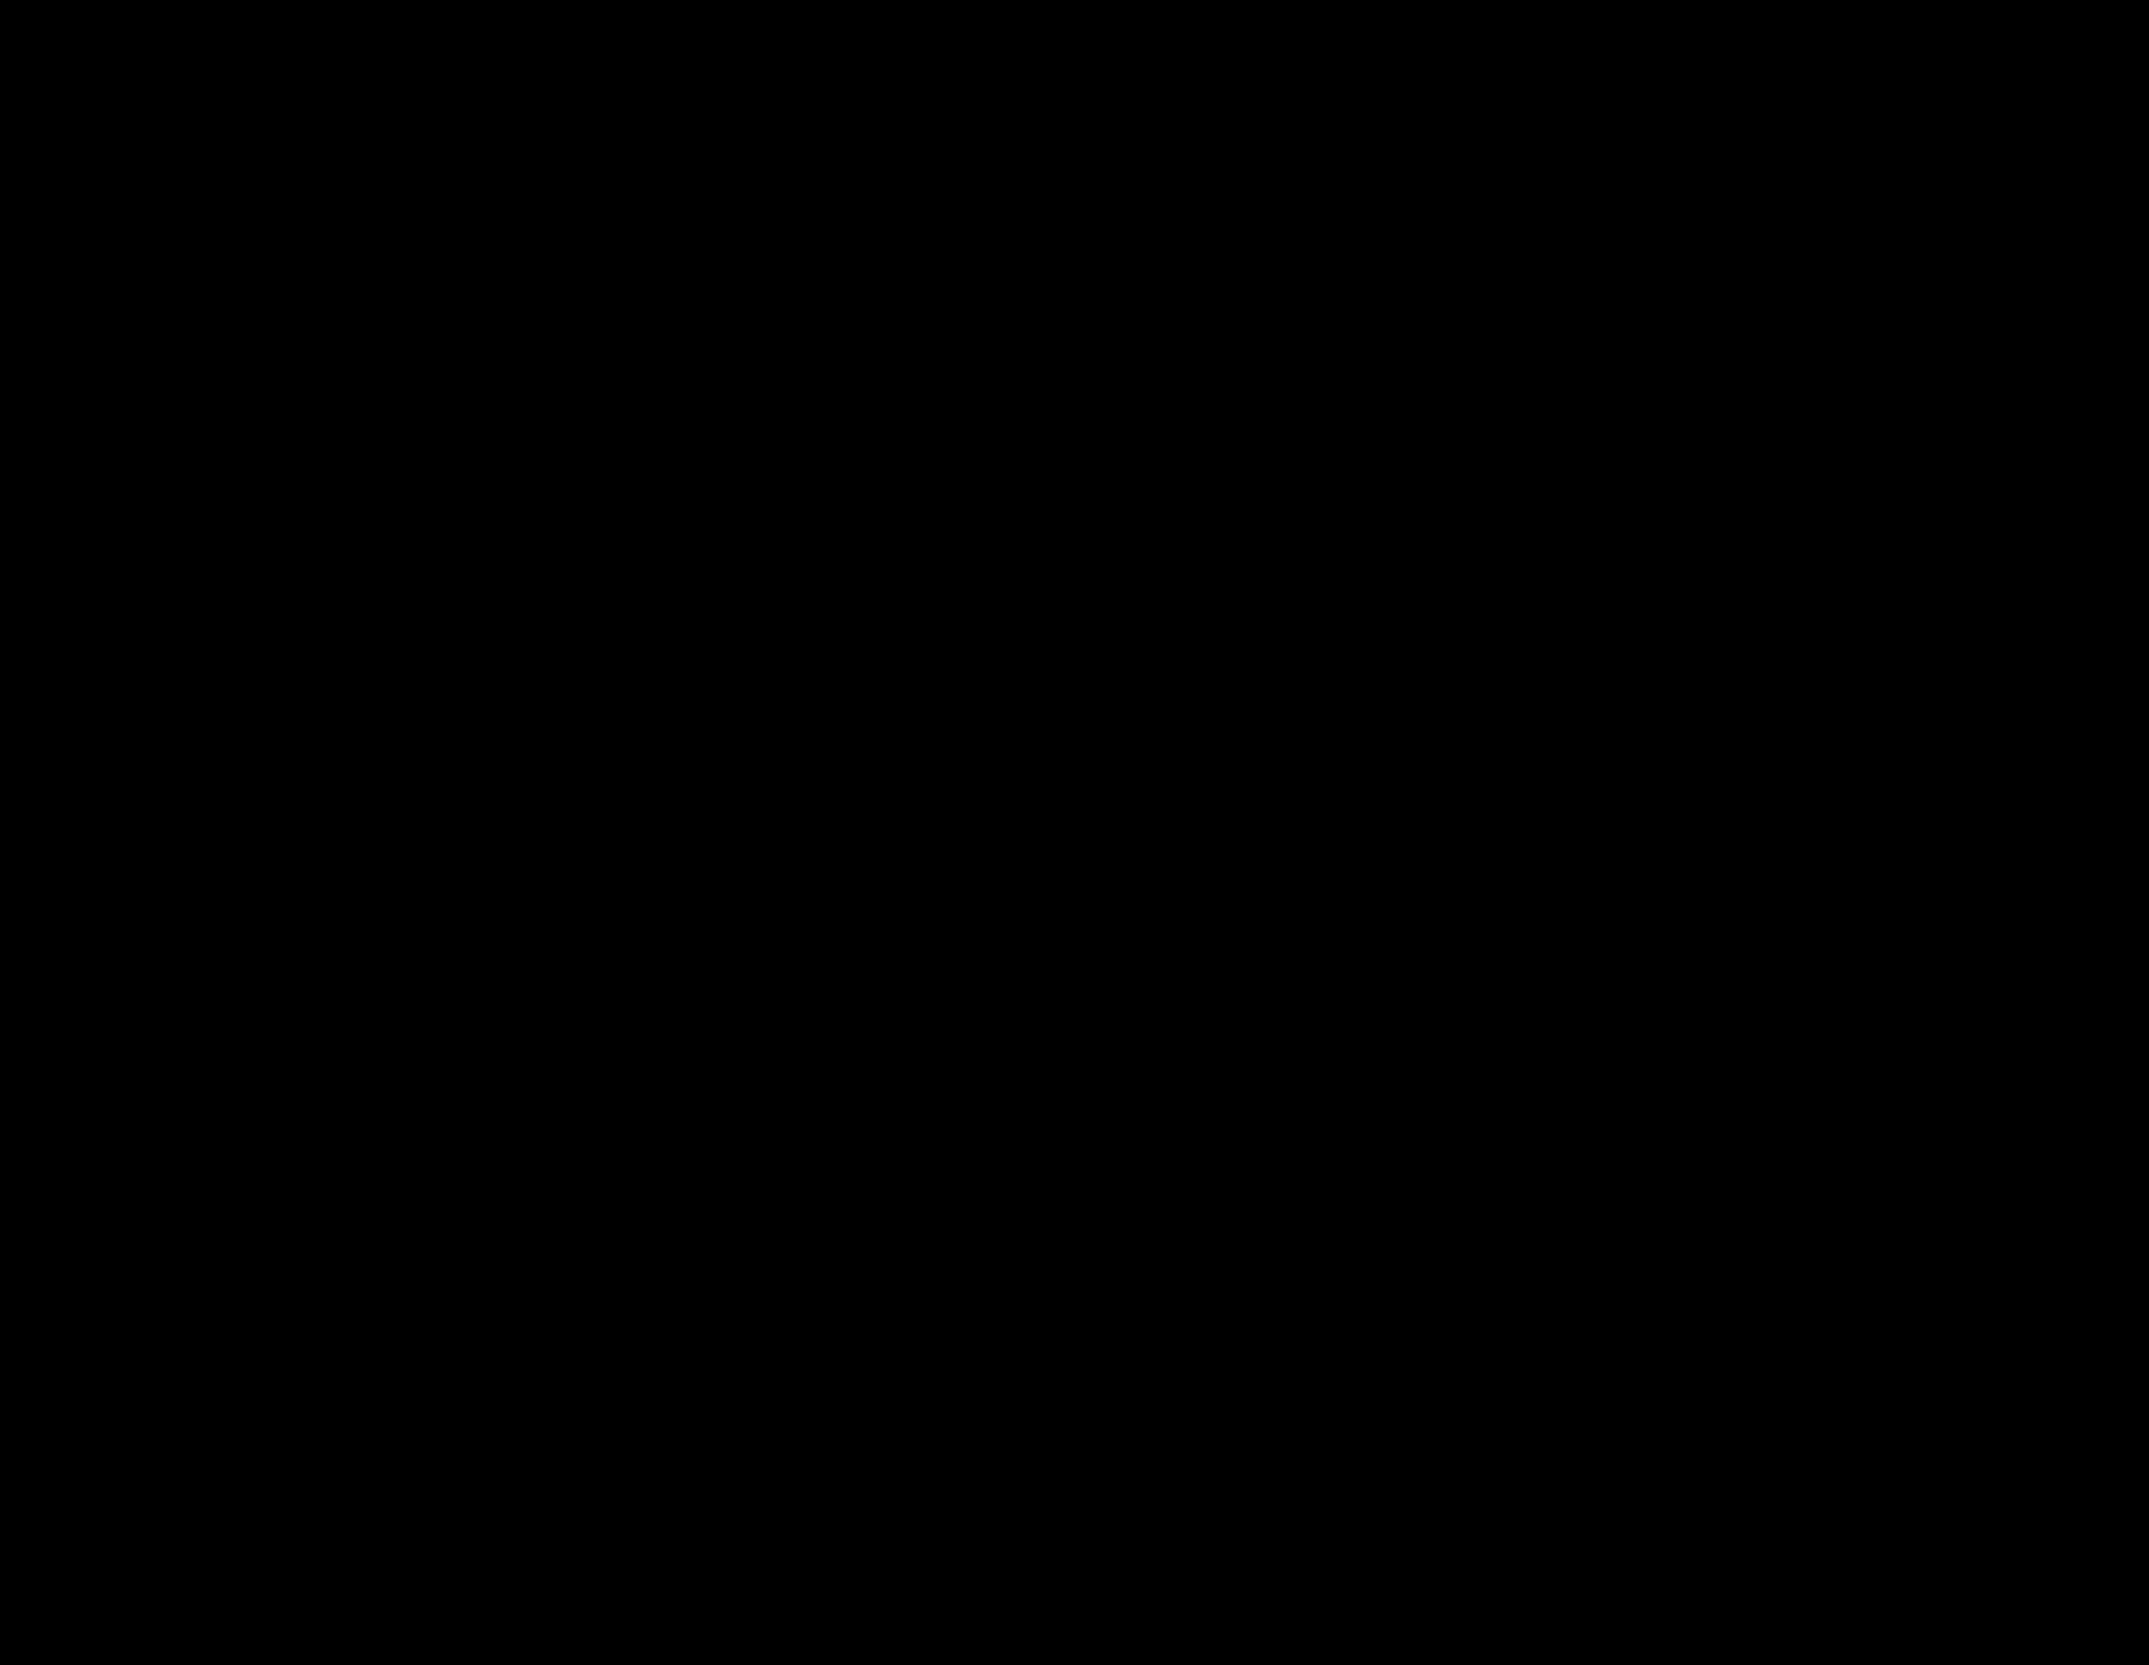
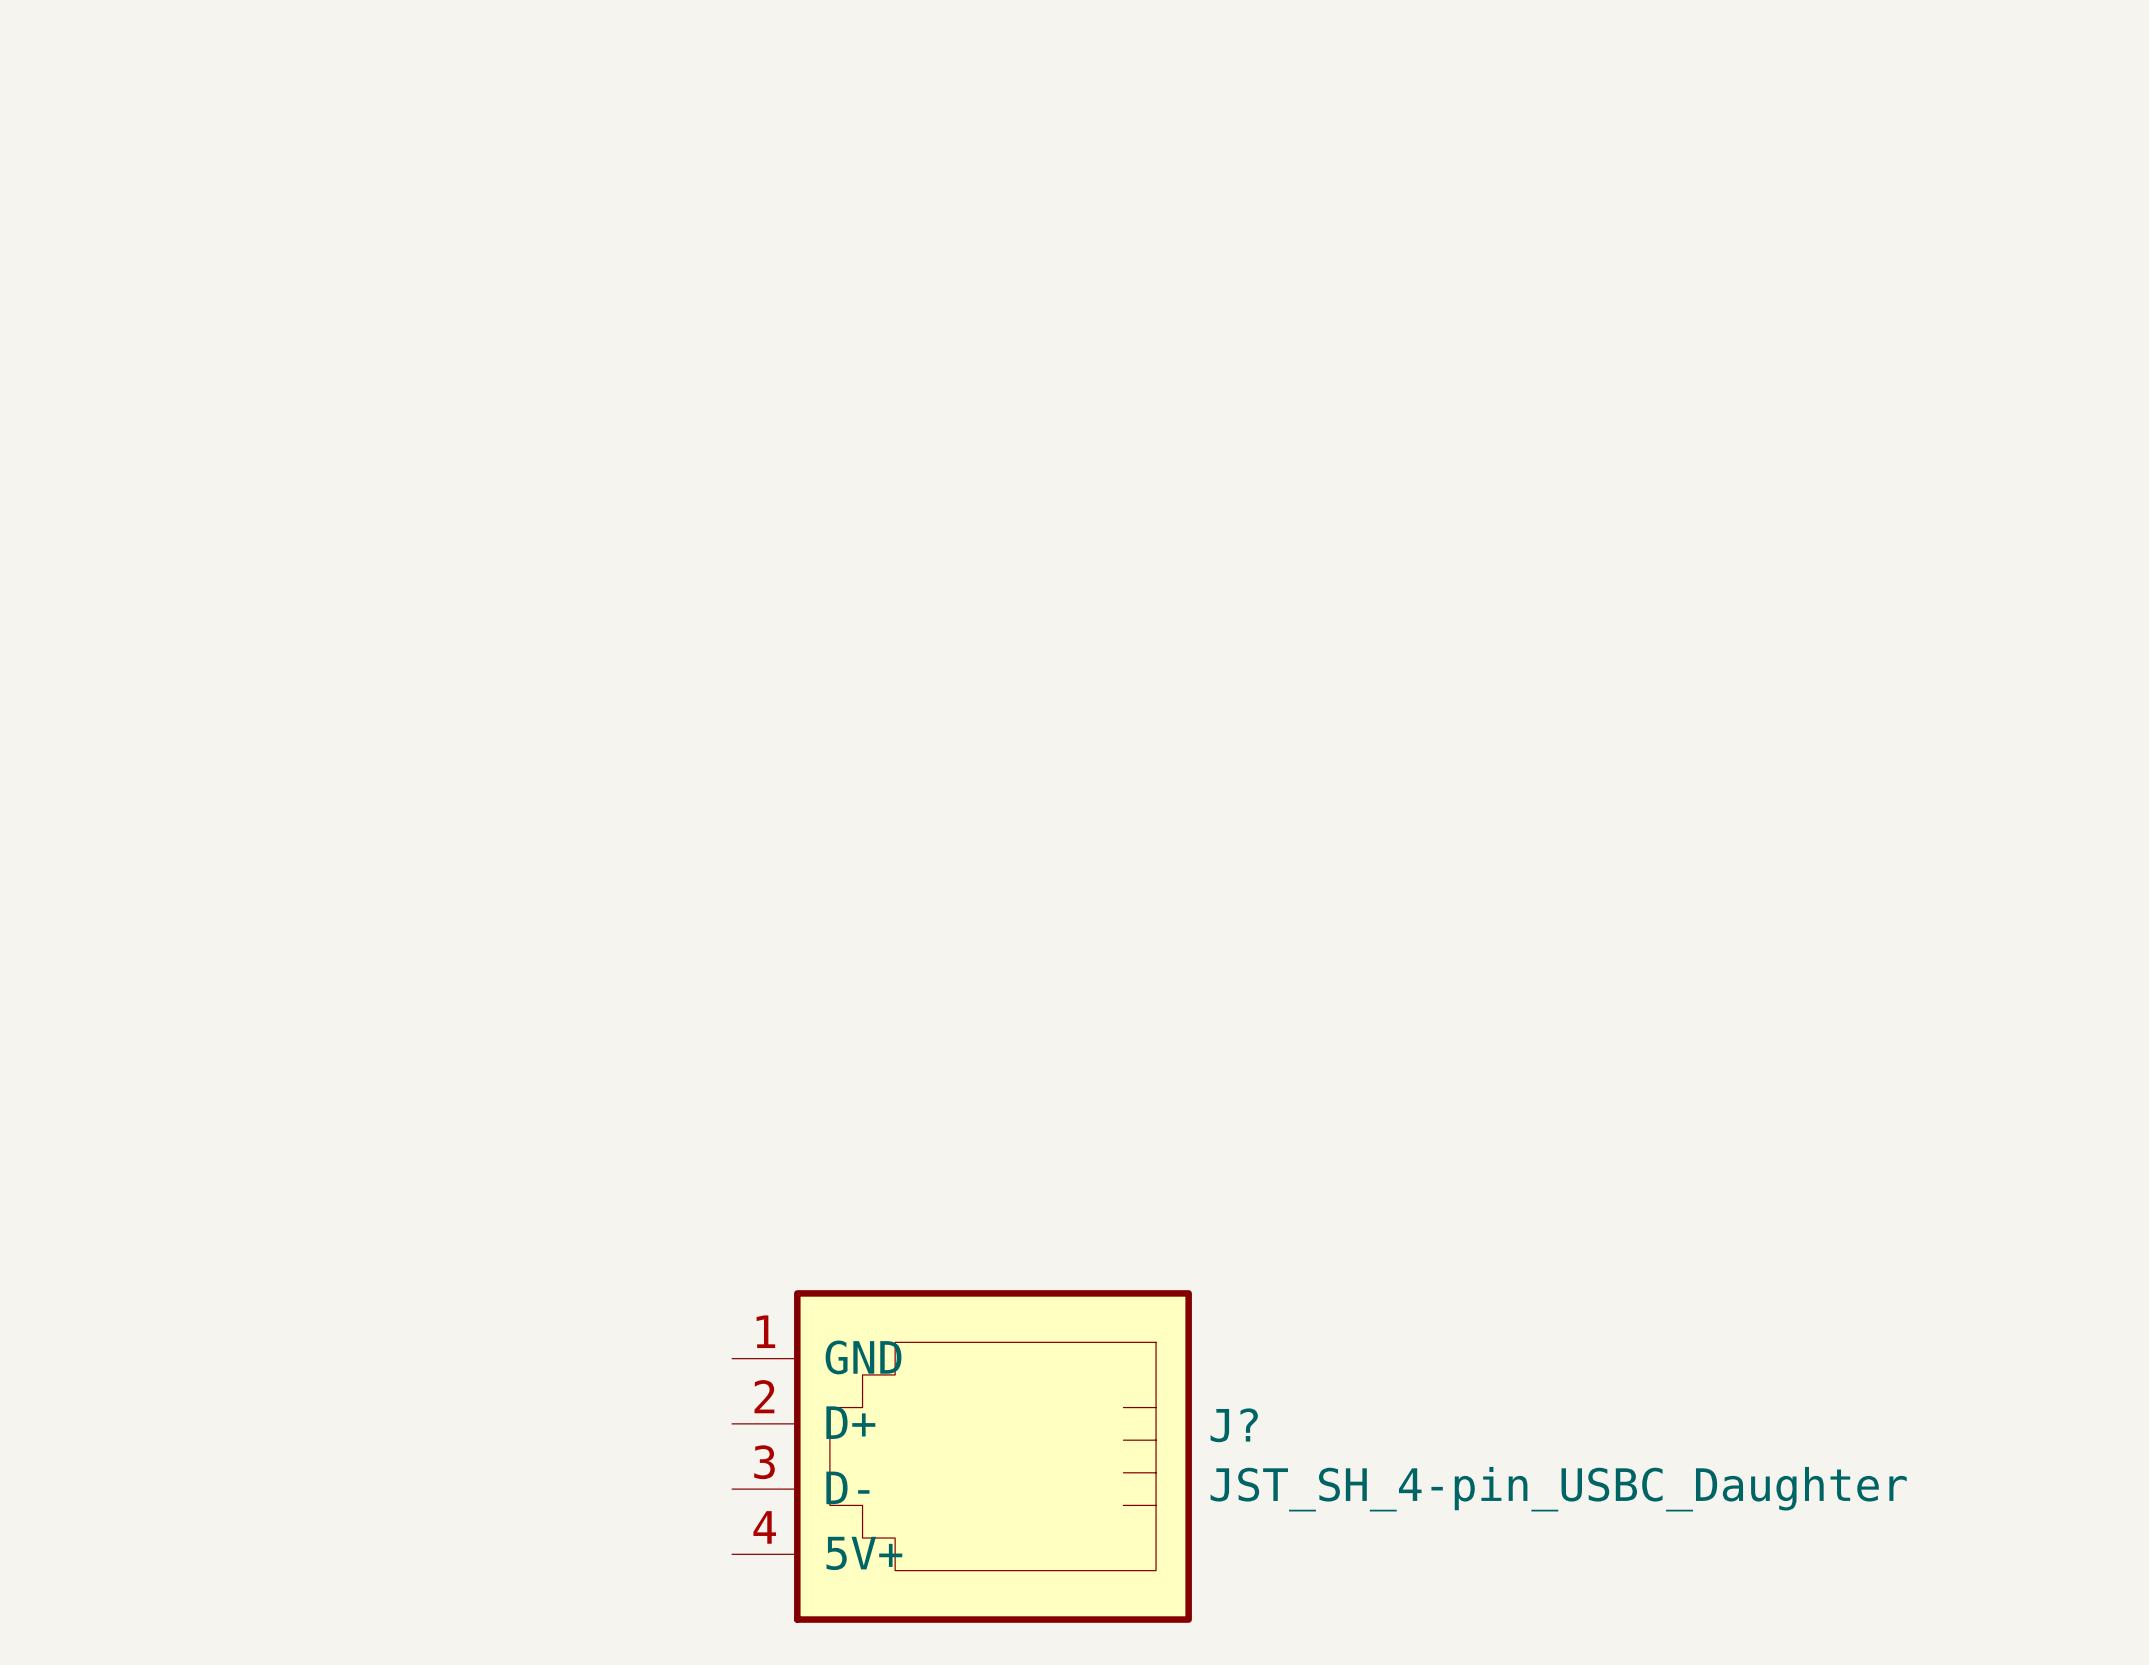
J?: none -> JST_SH_4-pin_USBC_Daughter (962, 1456)

